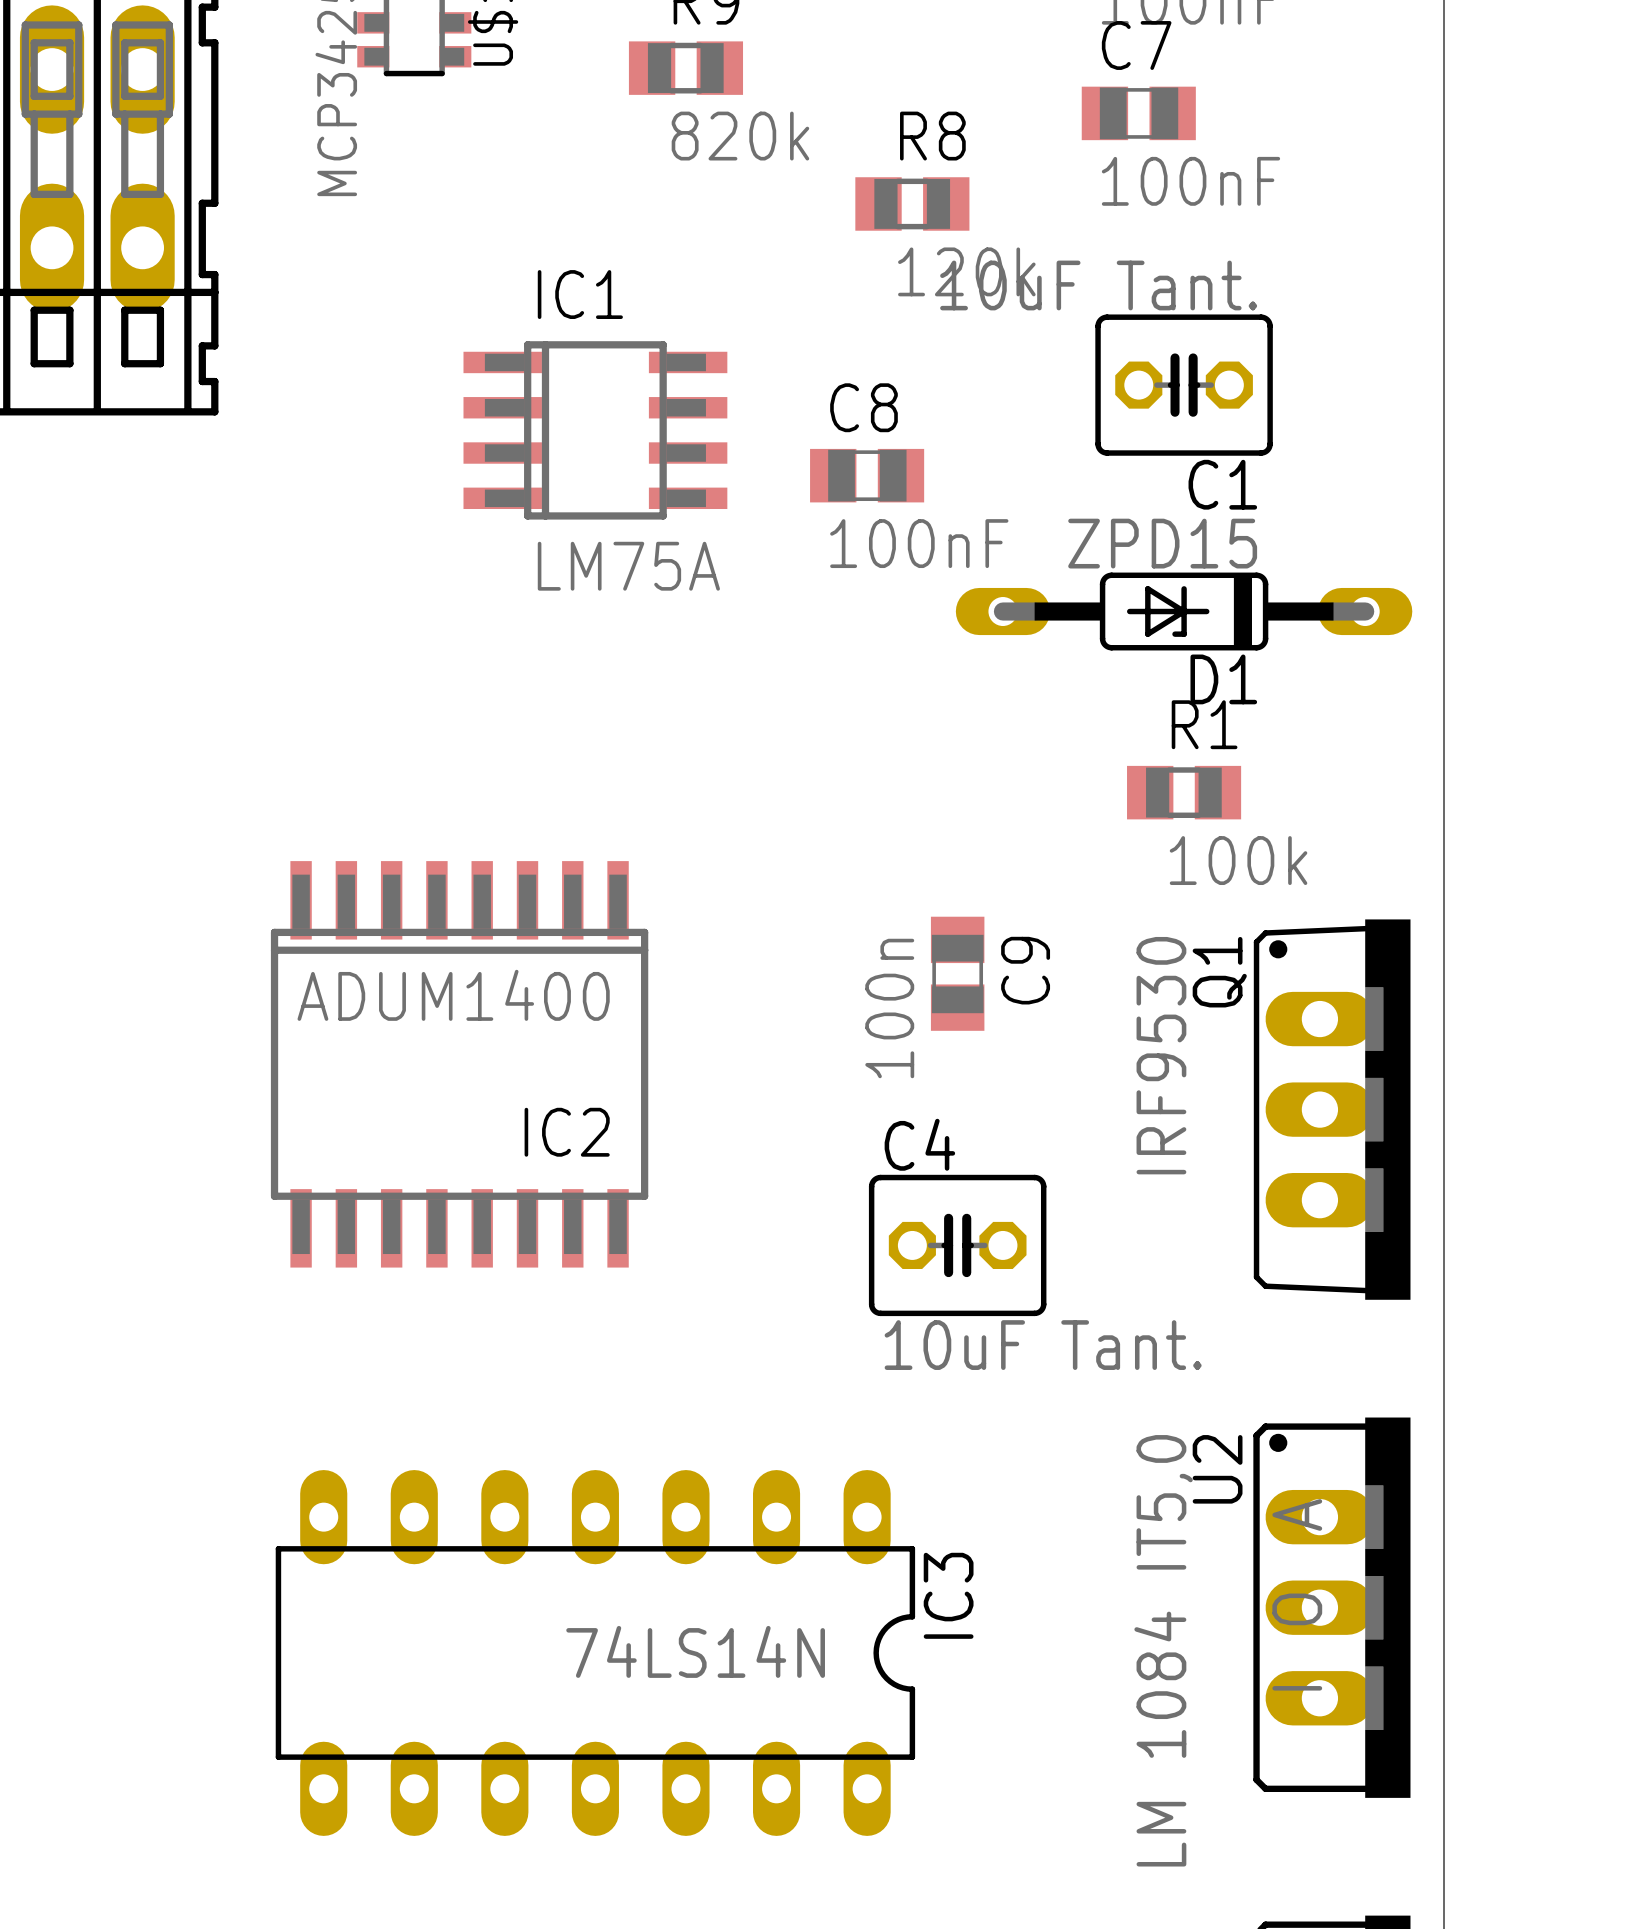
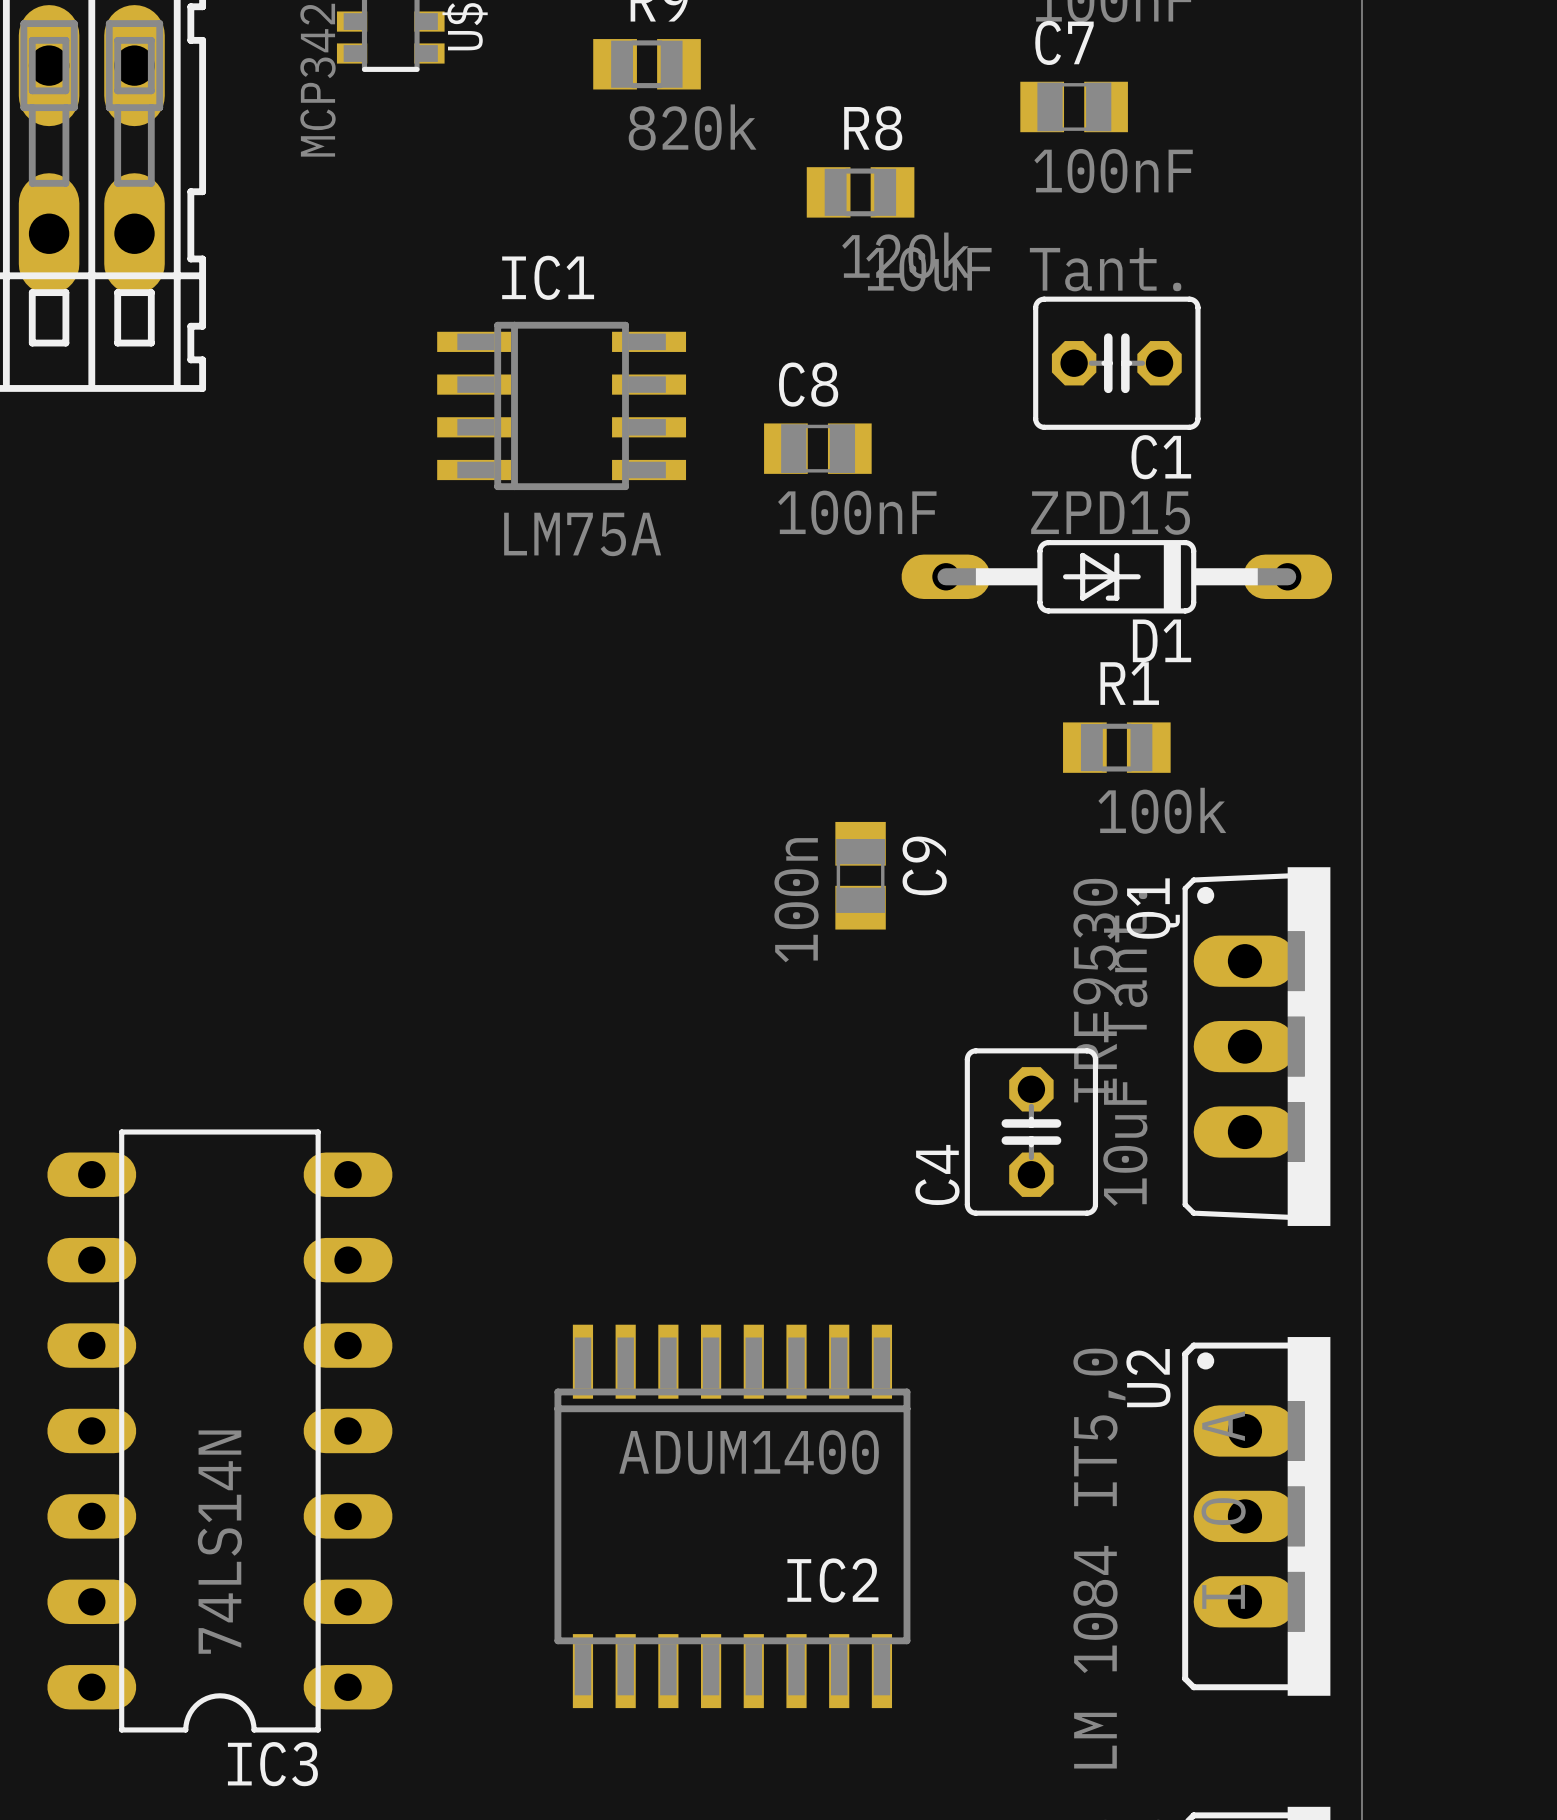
C9 position: (957, 973) -> (860, 875)
IC2 position: (459, 1064) -> (732, 1516)
C4 name position: C4 (919, 1144) -> C4 (937, 1174)
C4 rotation: 0° (957, 1245) -> 90° clockwise (1031, 1132)
C4 position: (957, 1245) -> (1031, 1132)
C4 value position: 10uF Tant. (1043, 1345) -> 10uF Tant. (1125, 1048)
IC3 rotation: 0° (595, 1652) -> 90° clockwise (219, 1430)
IC3 position: (595, 1652) -> (219, 1430)

